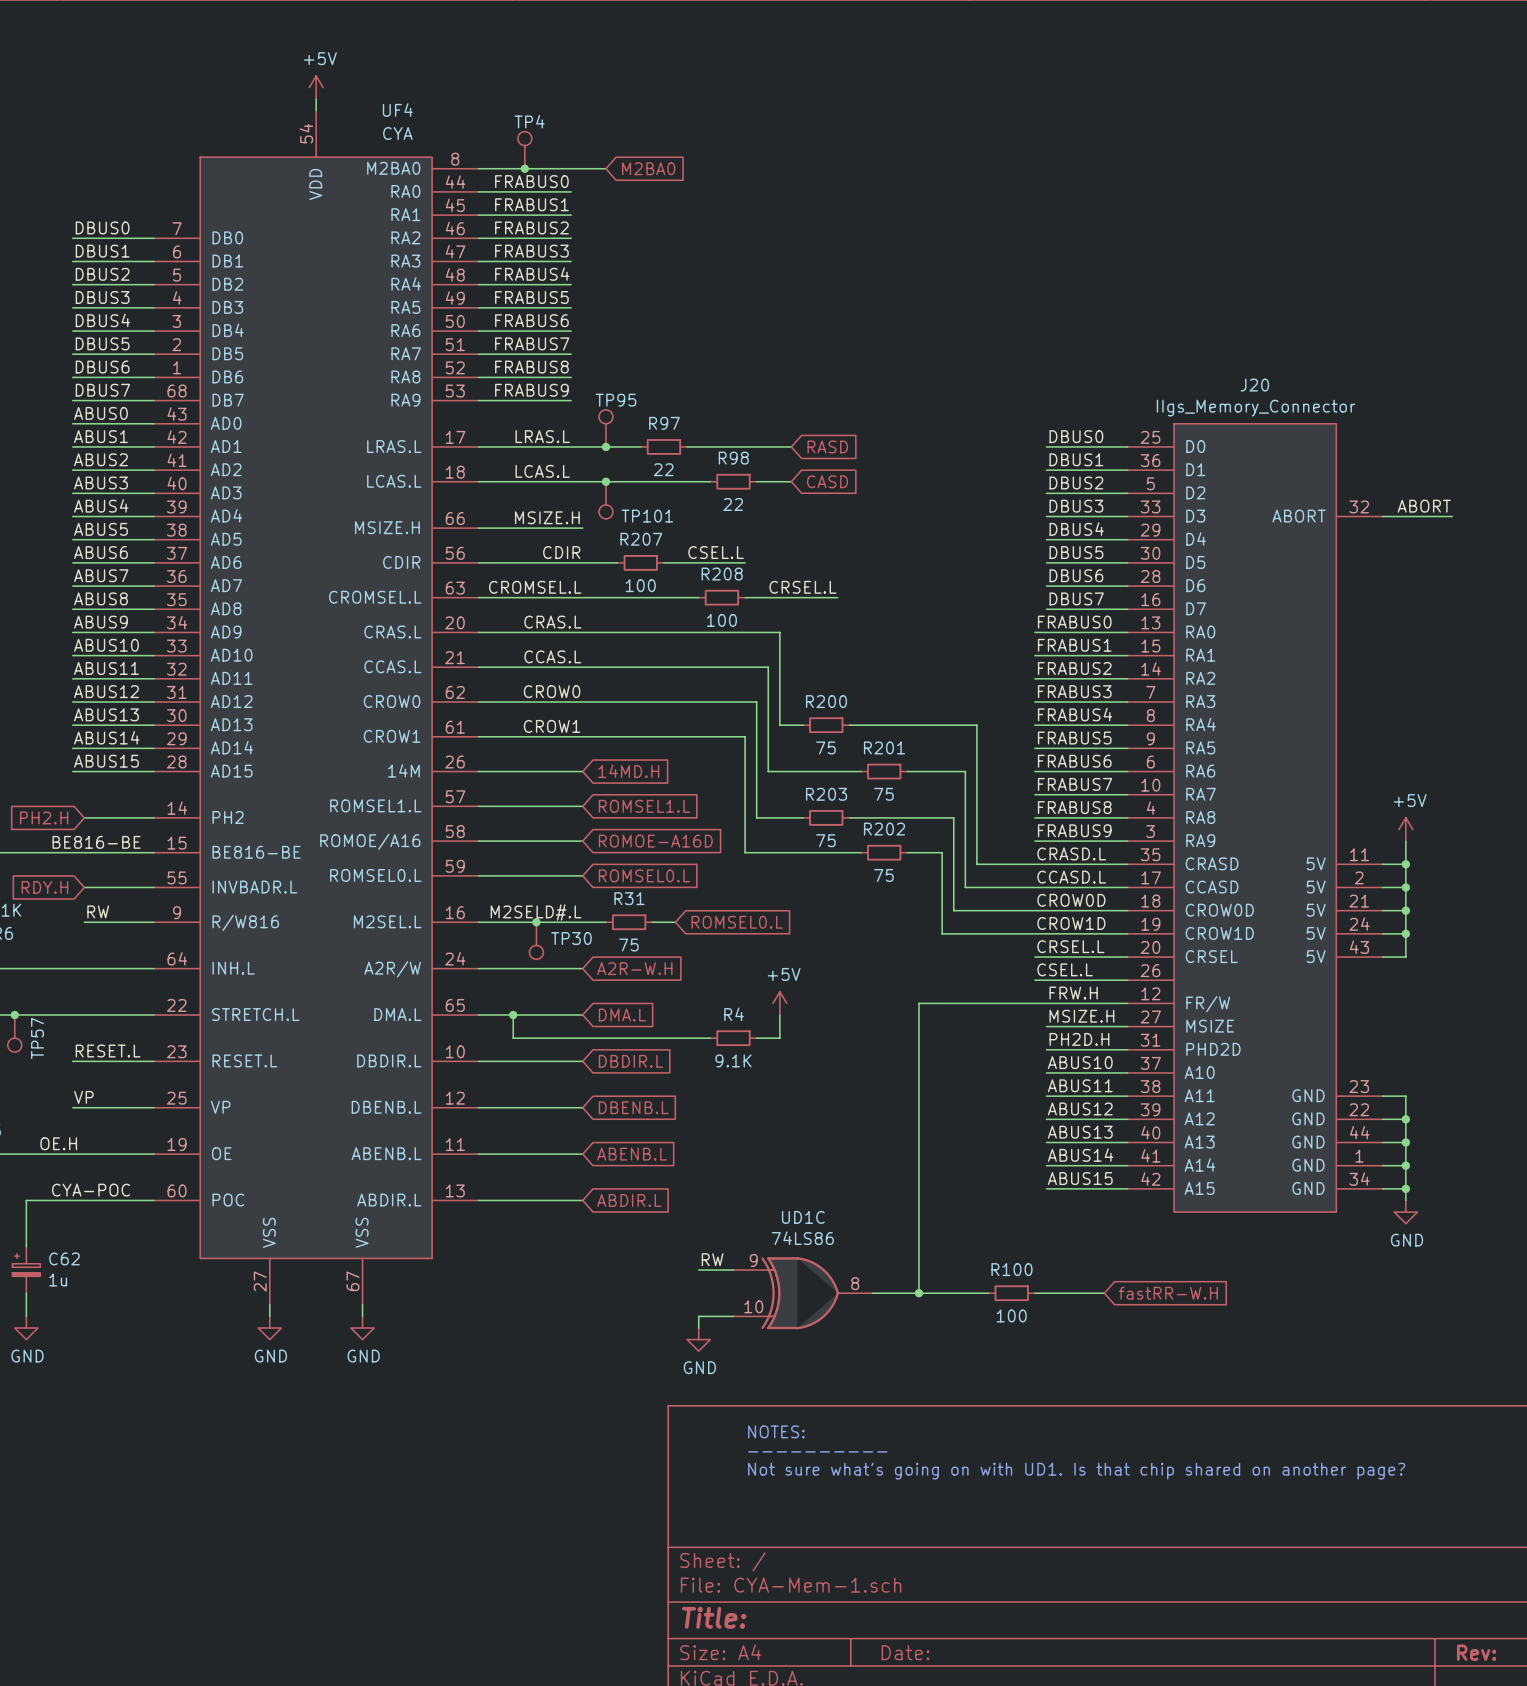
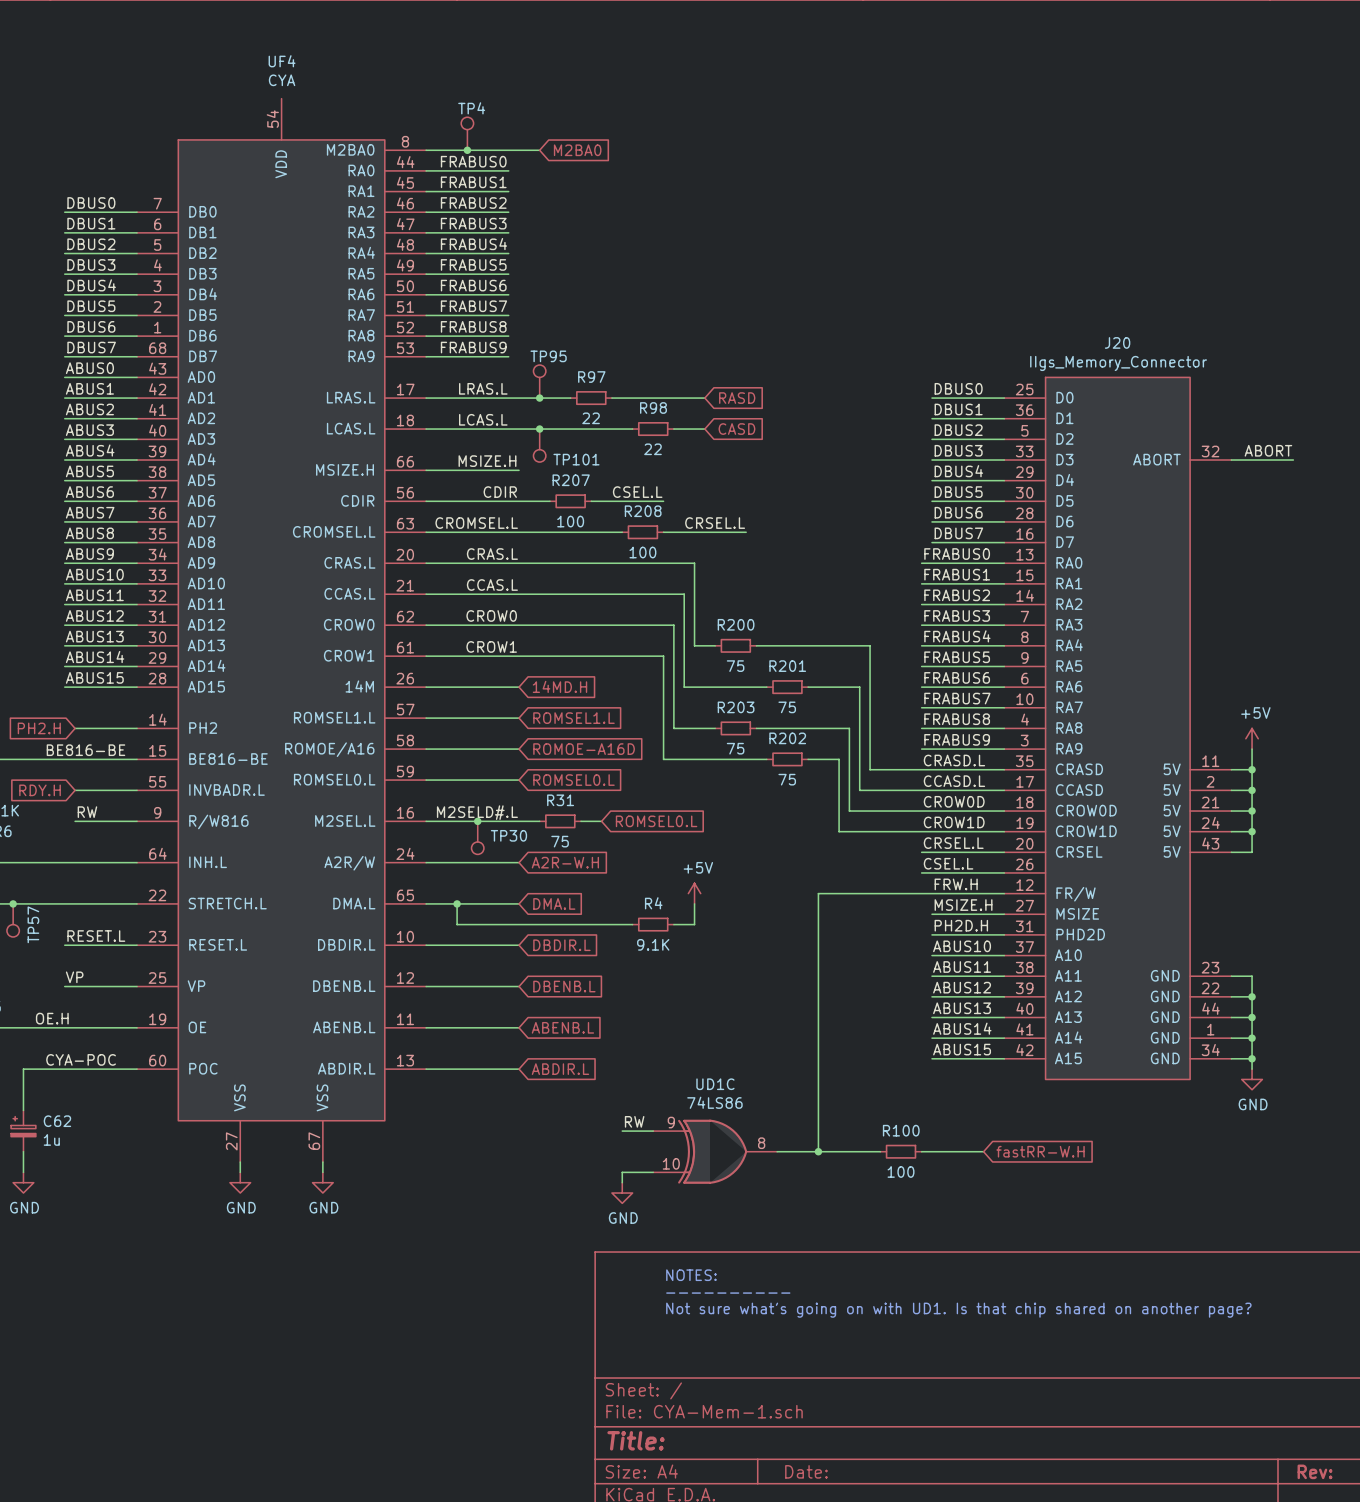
power symbol: +5V (316, 87) -> none
wire: (316, 99) (316, 110) -> none
UF4 name position: UF4 (397, 110) -> UF4 (282, 61)
UF4 value position: CYA (397, 133) -> CYA (282, 80)

